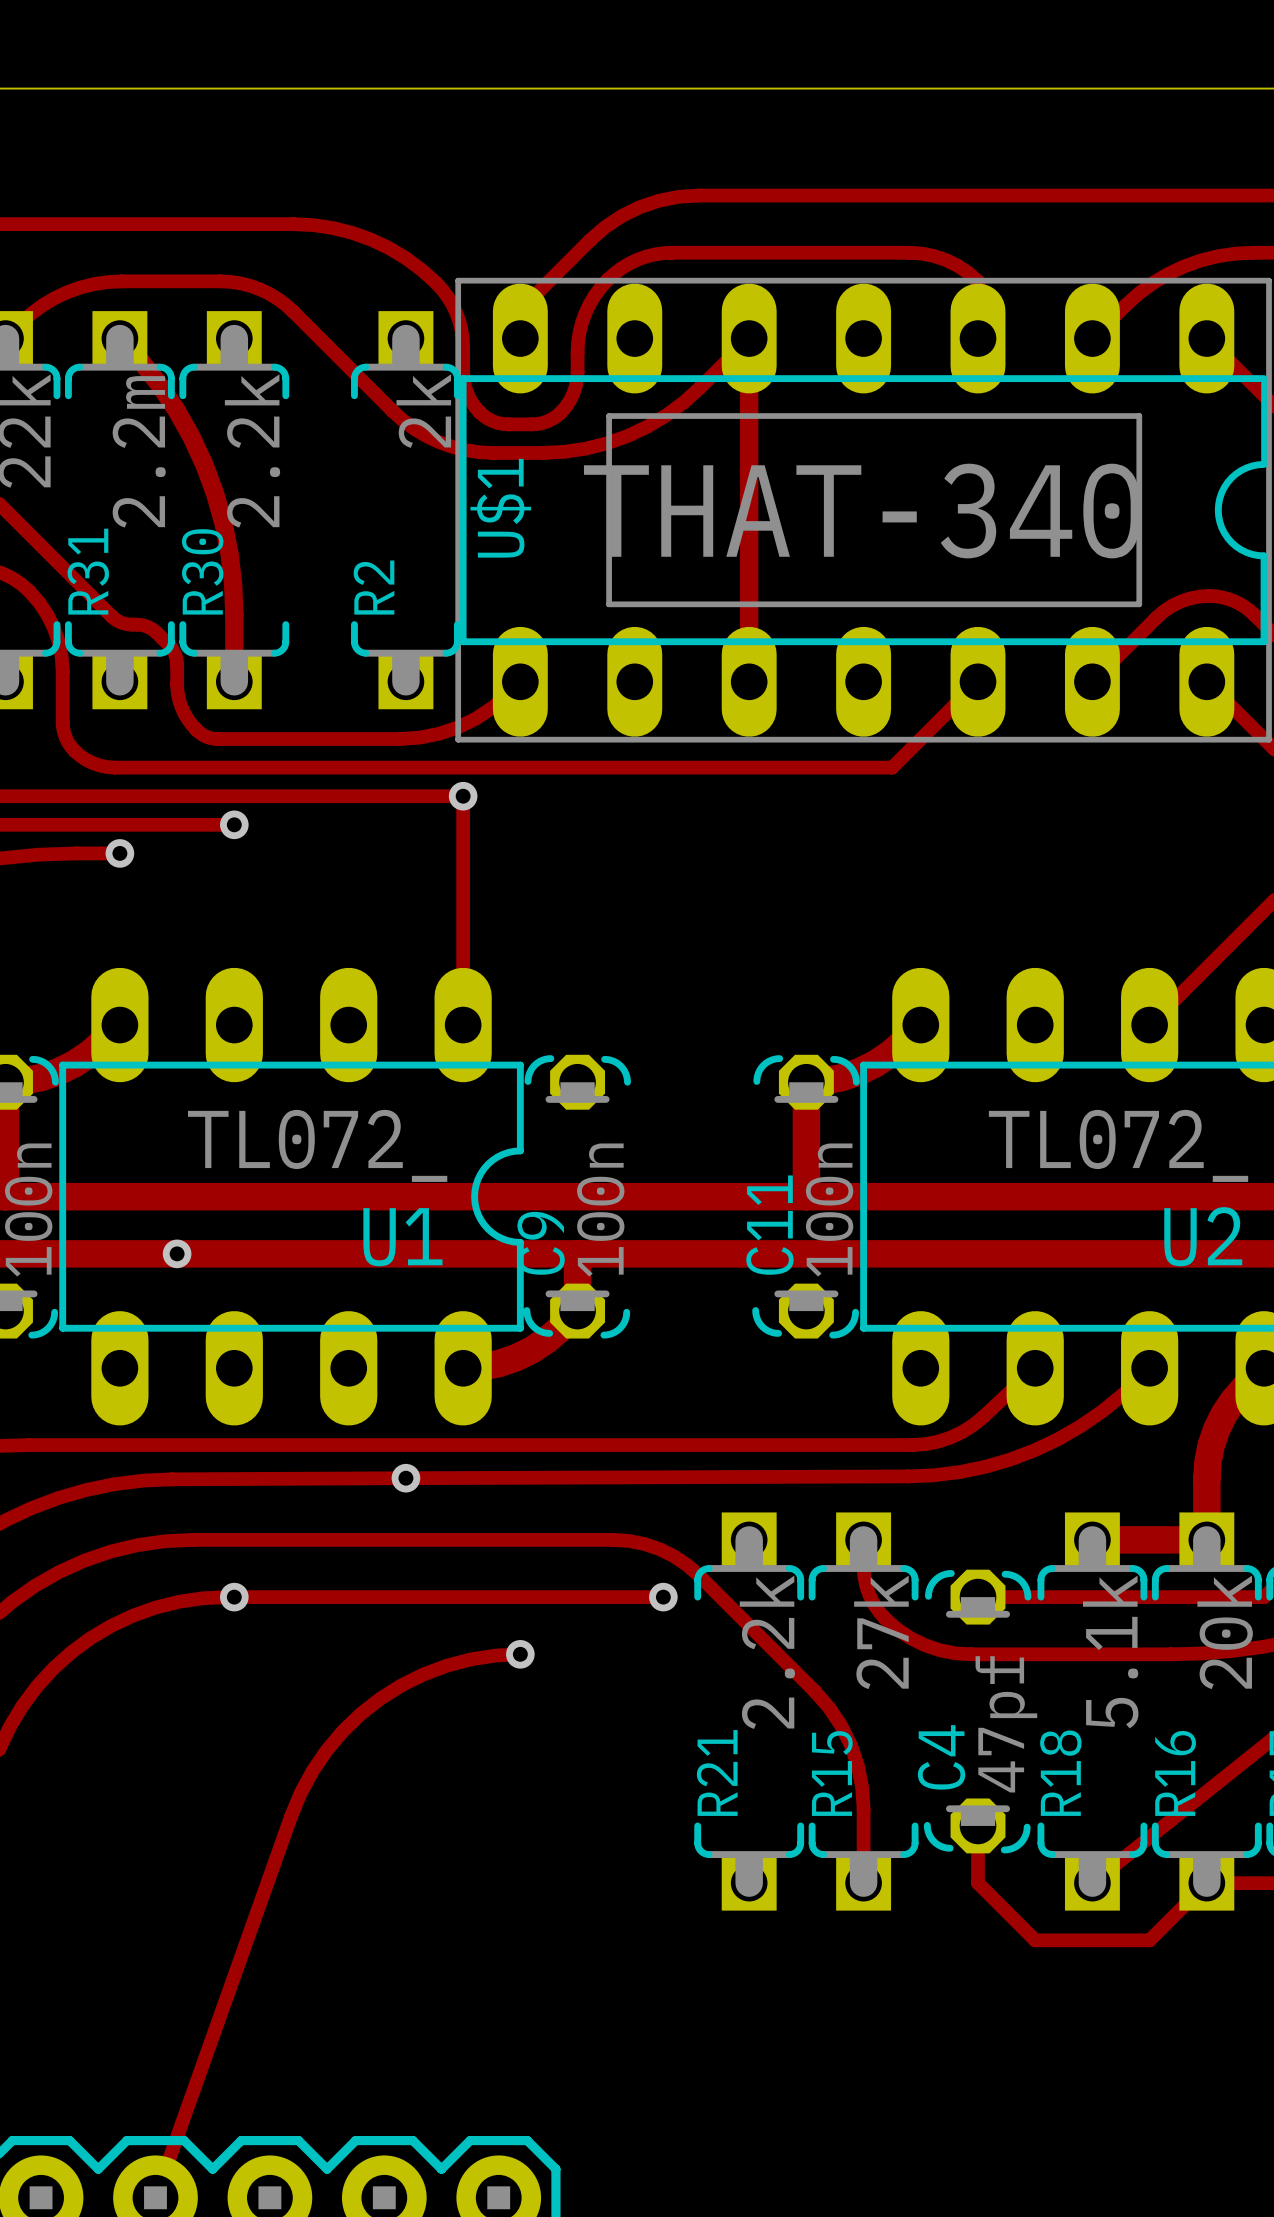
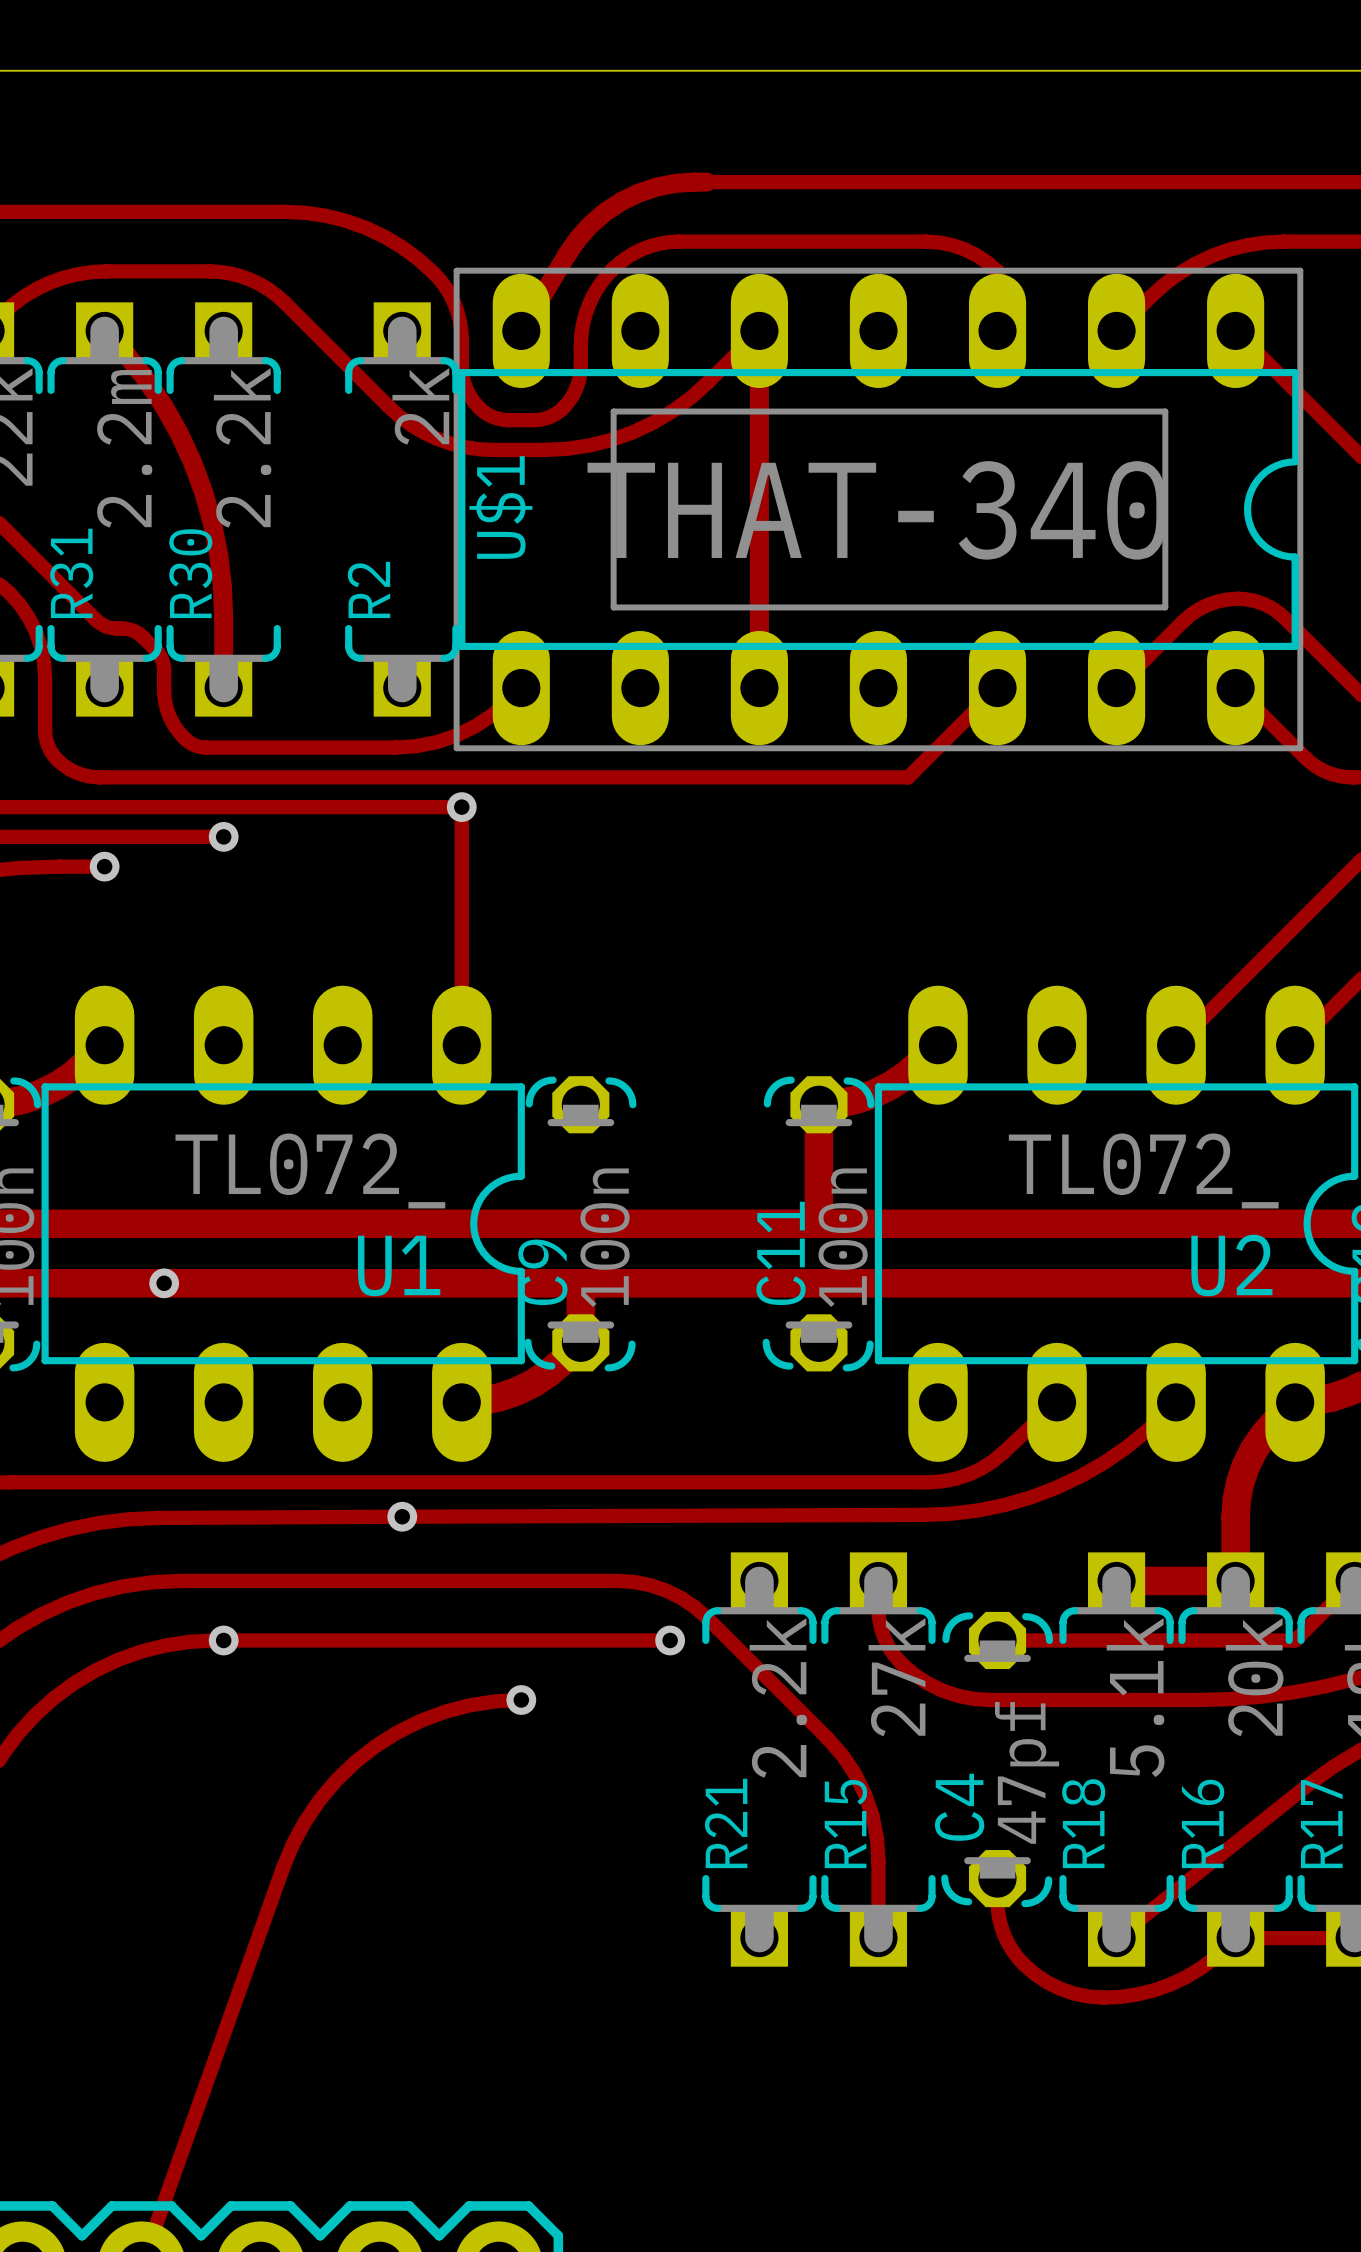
track: (698, 195) (658, 200) (639, 207) (604, 227) (520, 309) (520, 338) -> (706, 182) (675, 183) (656, 187) (621, 201) (605, 211) (578, 238) (521, 330)
track: (978, 1847) (978, 1883) (1035, 1940) (1149, 1940) (1198, 1891) -> (997, 1901) (1001, 1927) (1008, 1943) (1017, 1957) (1034, 1974) (1047, 1982) (1074, 1993) (1104, 1997) (1138, 1994) (1154, 1990) (1170, 1984) (1200, 1968) (1226, 1946)

